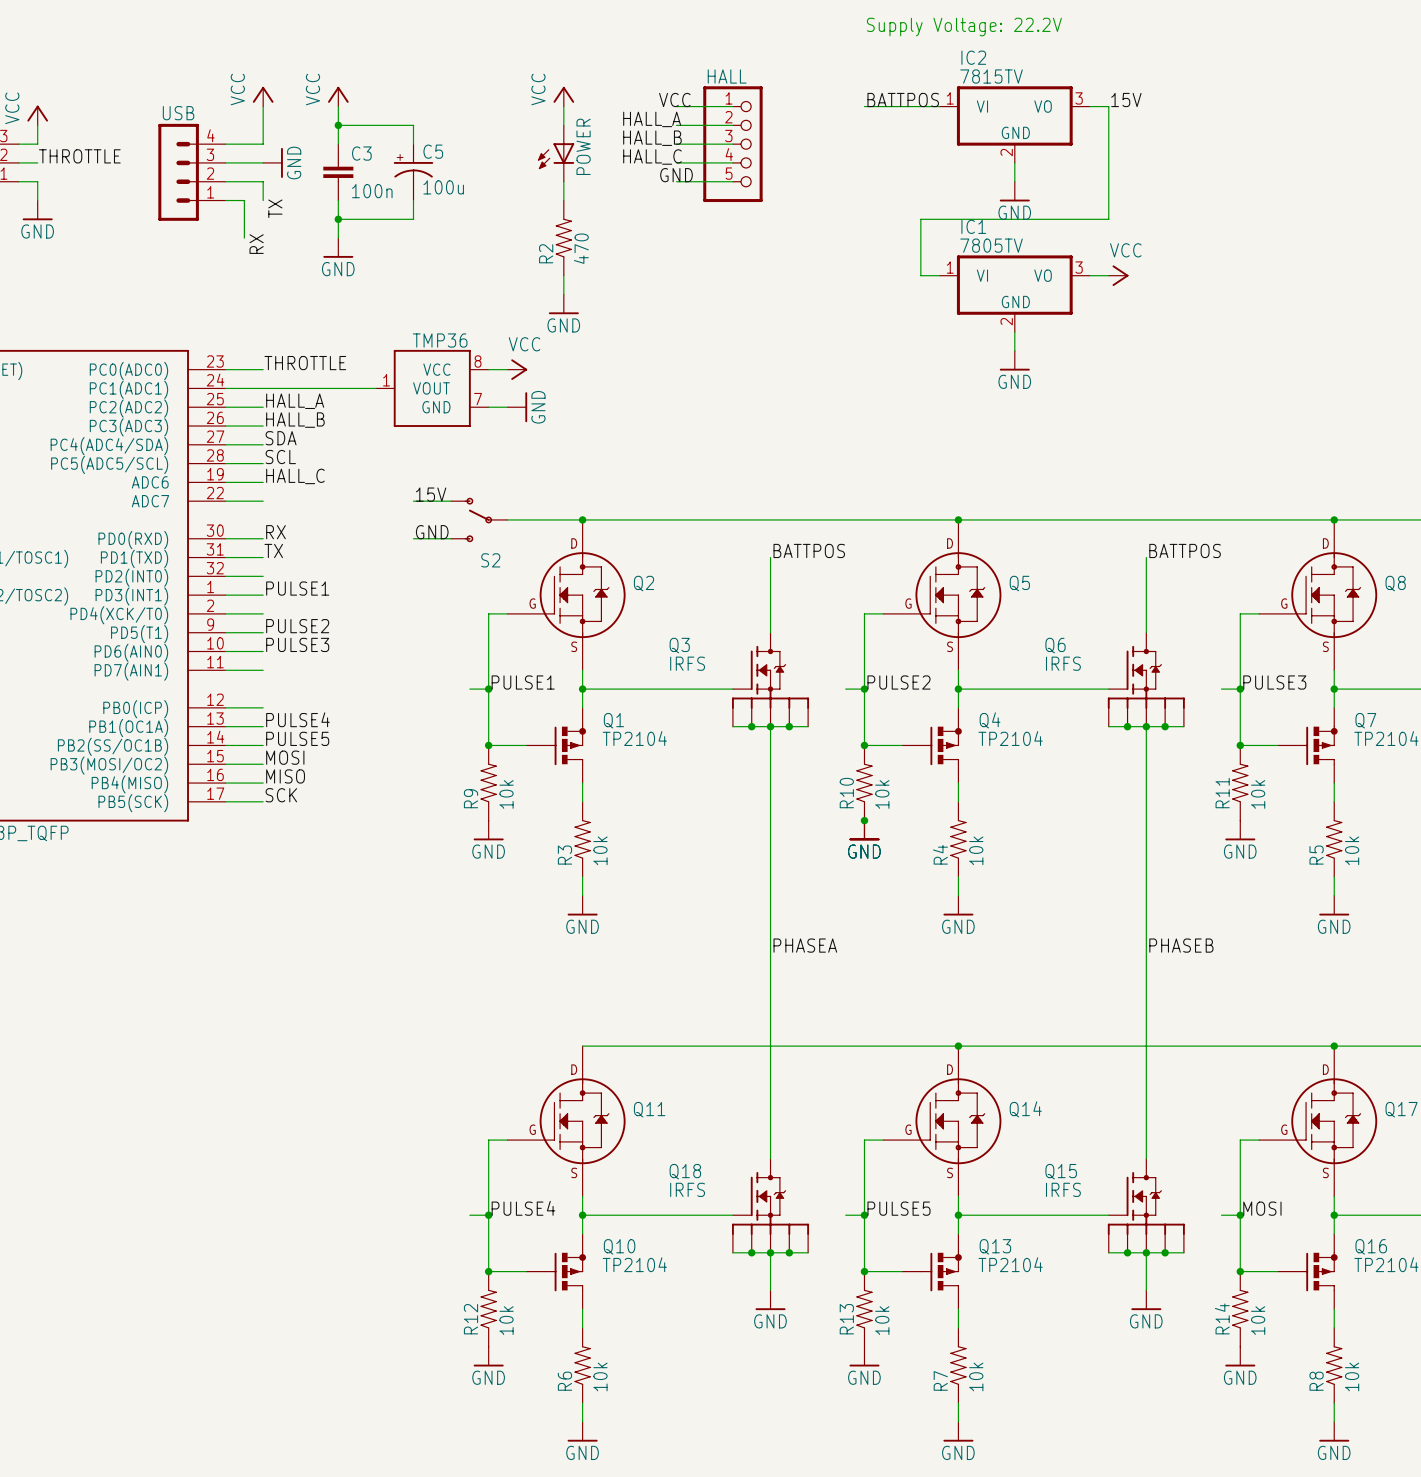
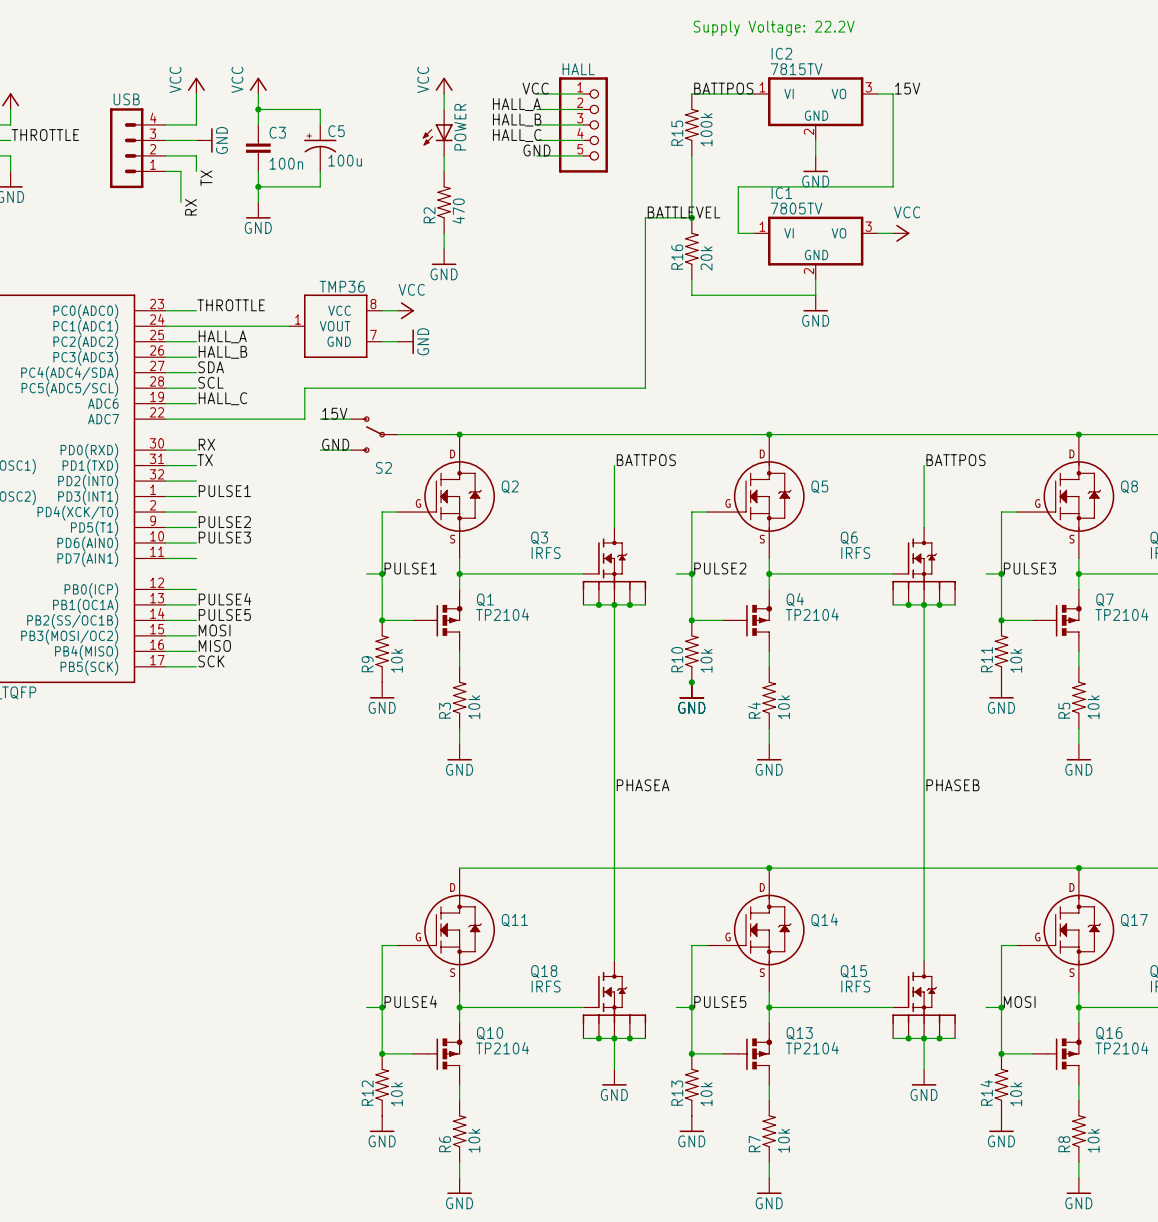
R15: none -> 100k (691, 124)
wire: none -> (691, 155) (691, 217) (645, 217) (645, 388) (304, 388) (304, 419) (196, 419)
label: none -> BATTLEVEL (684, 212)
junction: none -> (691, 217)
R16: none -> 20k (691, 248)
wire: none -> (691, 279) (691, 295) (815, 295)

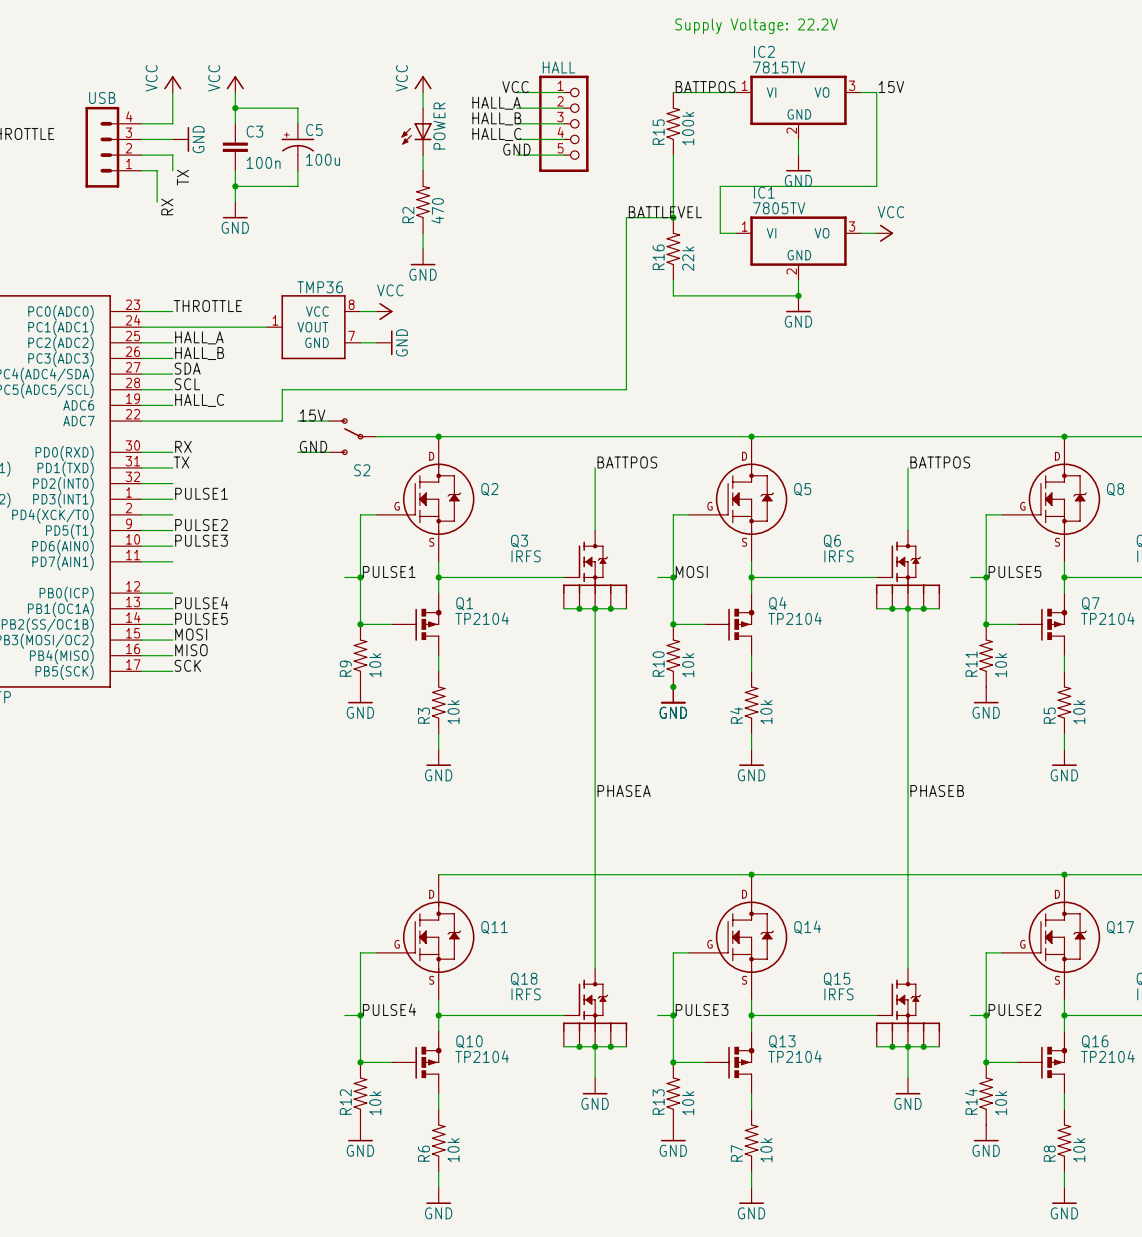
R16 value: 20k (706, 258) -> 22k (688, 258)
junction: none -> (798, 295)
label: PULSE2 (720, 568) -> MOSI (691, 571)
label: PULSE3 (1029, 568) -> PULSE5 (1014, 571)
label: PULSE5 (720, 1002) -> PULSE3 (702, 1010)
label: MOSI (1019, 1002) -> PULSE2 (1014, 1010)

